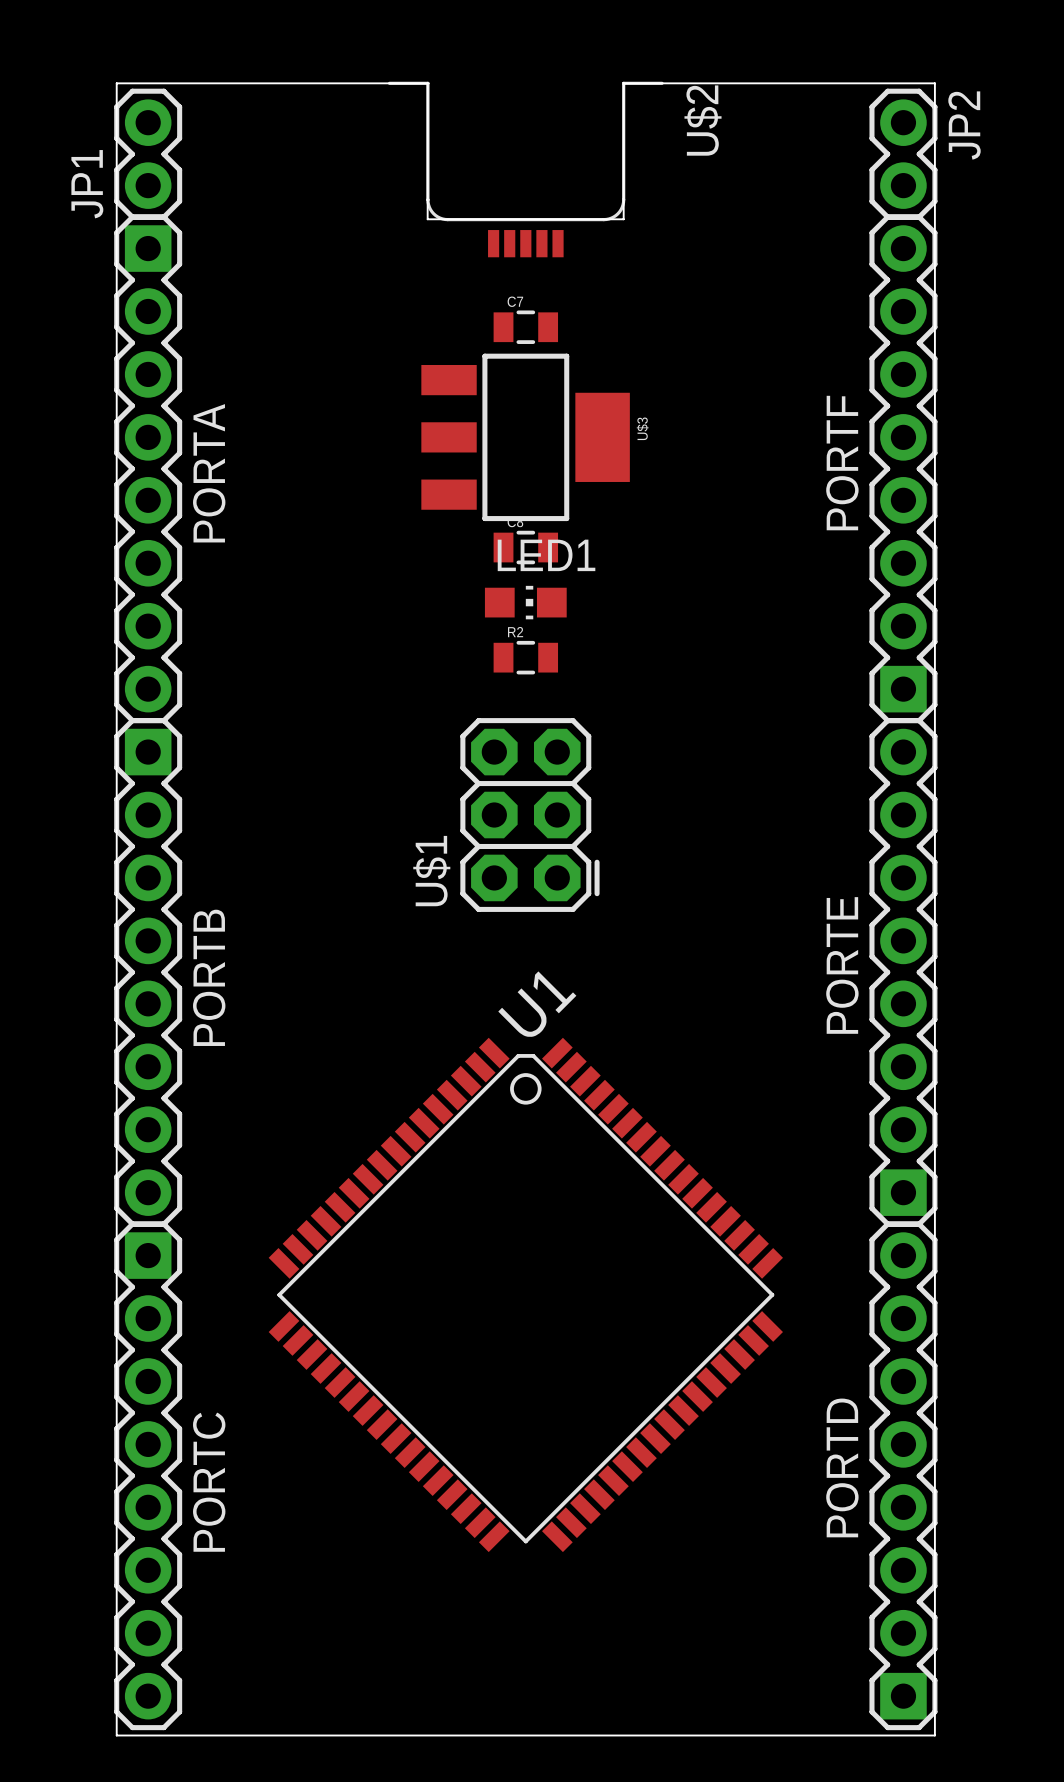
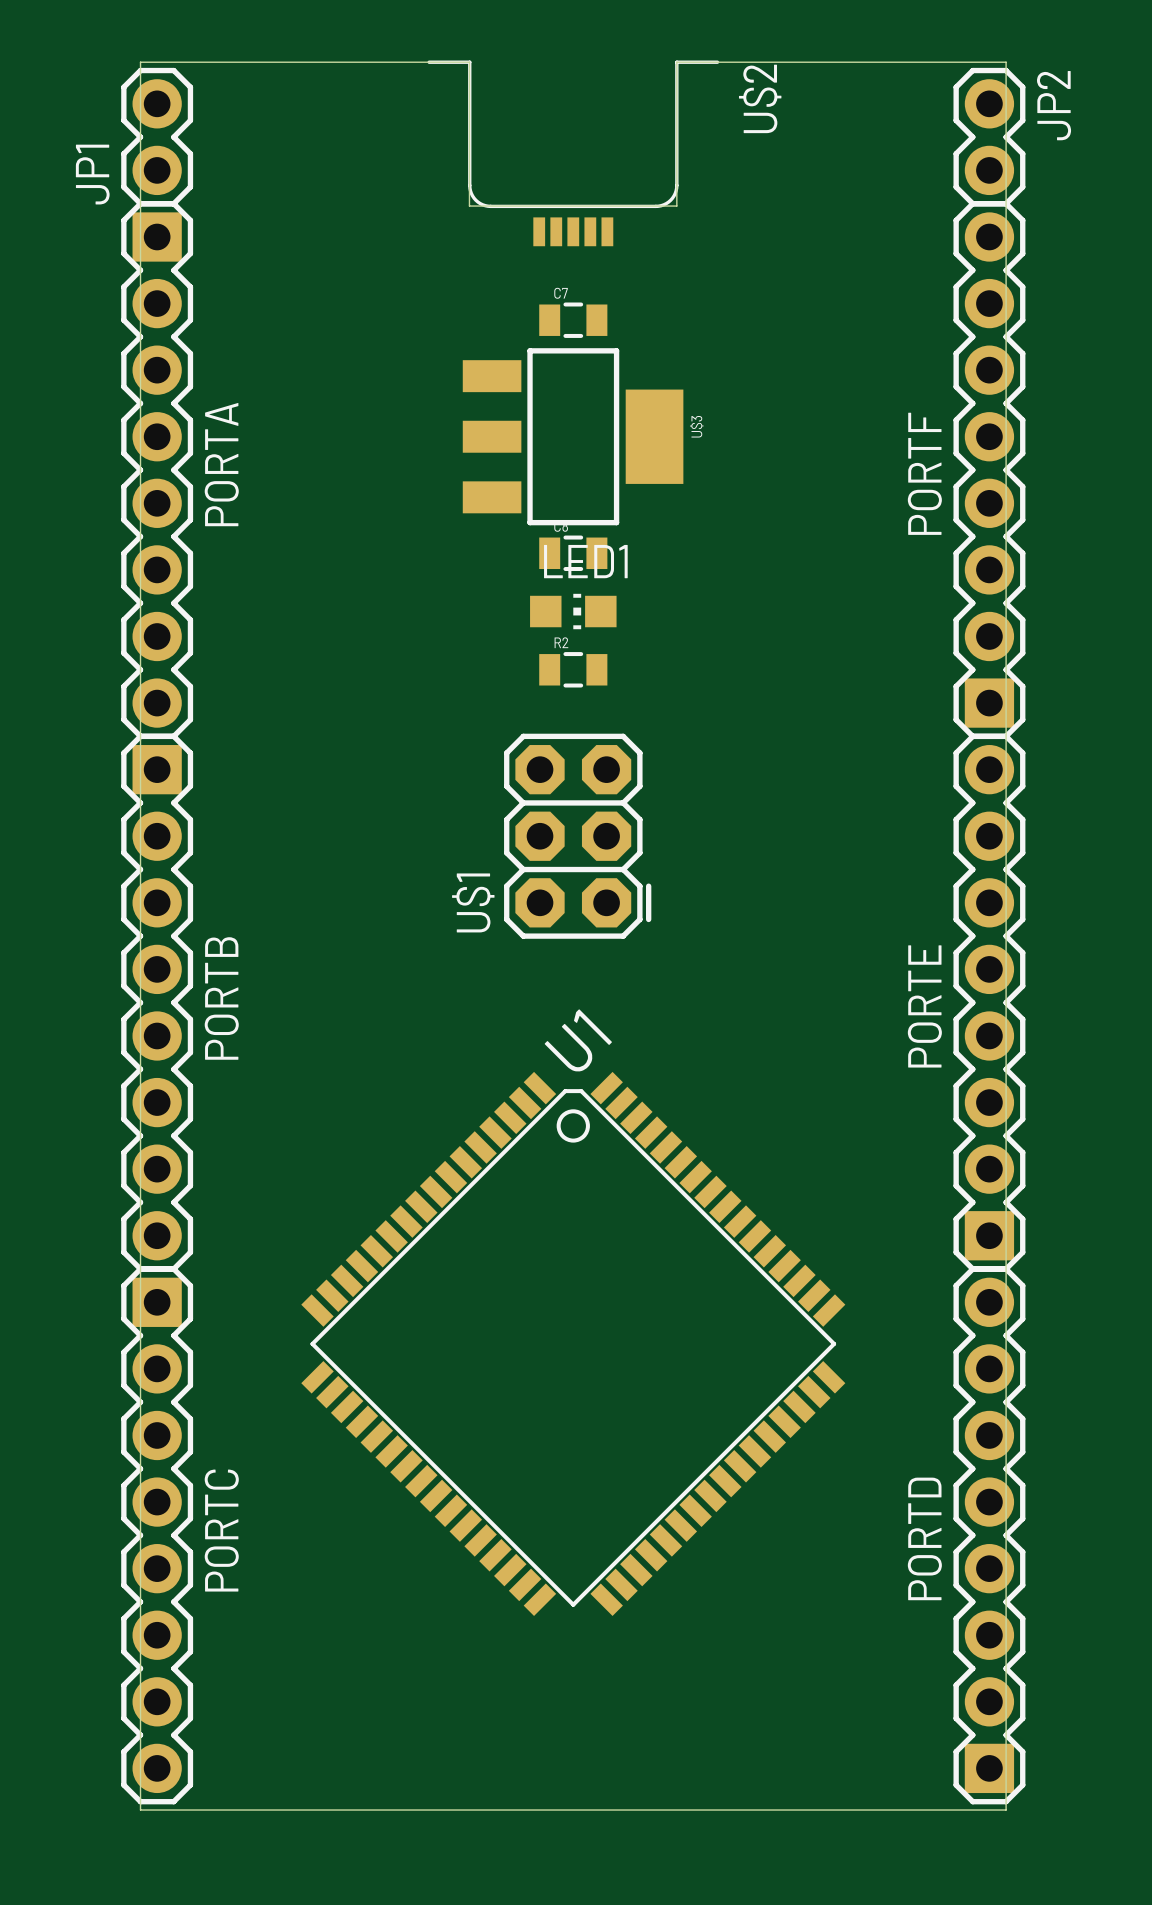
JP1 position: (148, 154) -> (157, 137)
JP2 position: (903, 154) -> (989, 137)
PORTA position: (148, 468) -> (157, 470)
PORTF position: (903, 468) -> (989, 470)
PORTB position: (148, 972) -> (157, 1002)
PORTE position: (903, 972) -> (989, 1002)
PORTC position: (148, 1475) -> (157, 1535)
PORTD position: (903, 1475) -> (989, 1535)

